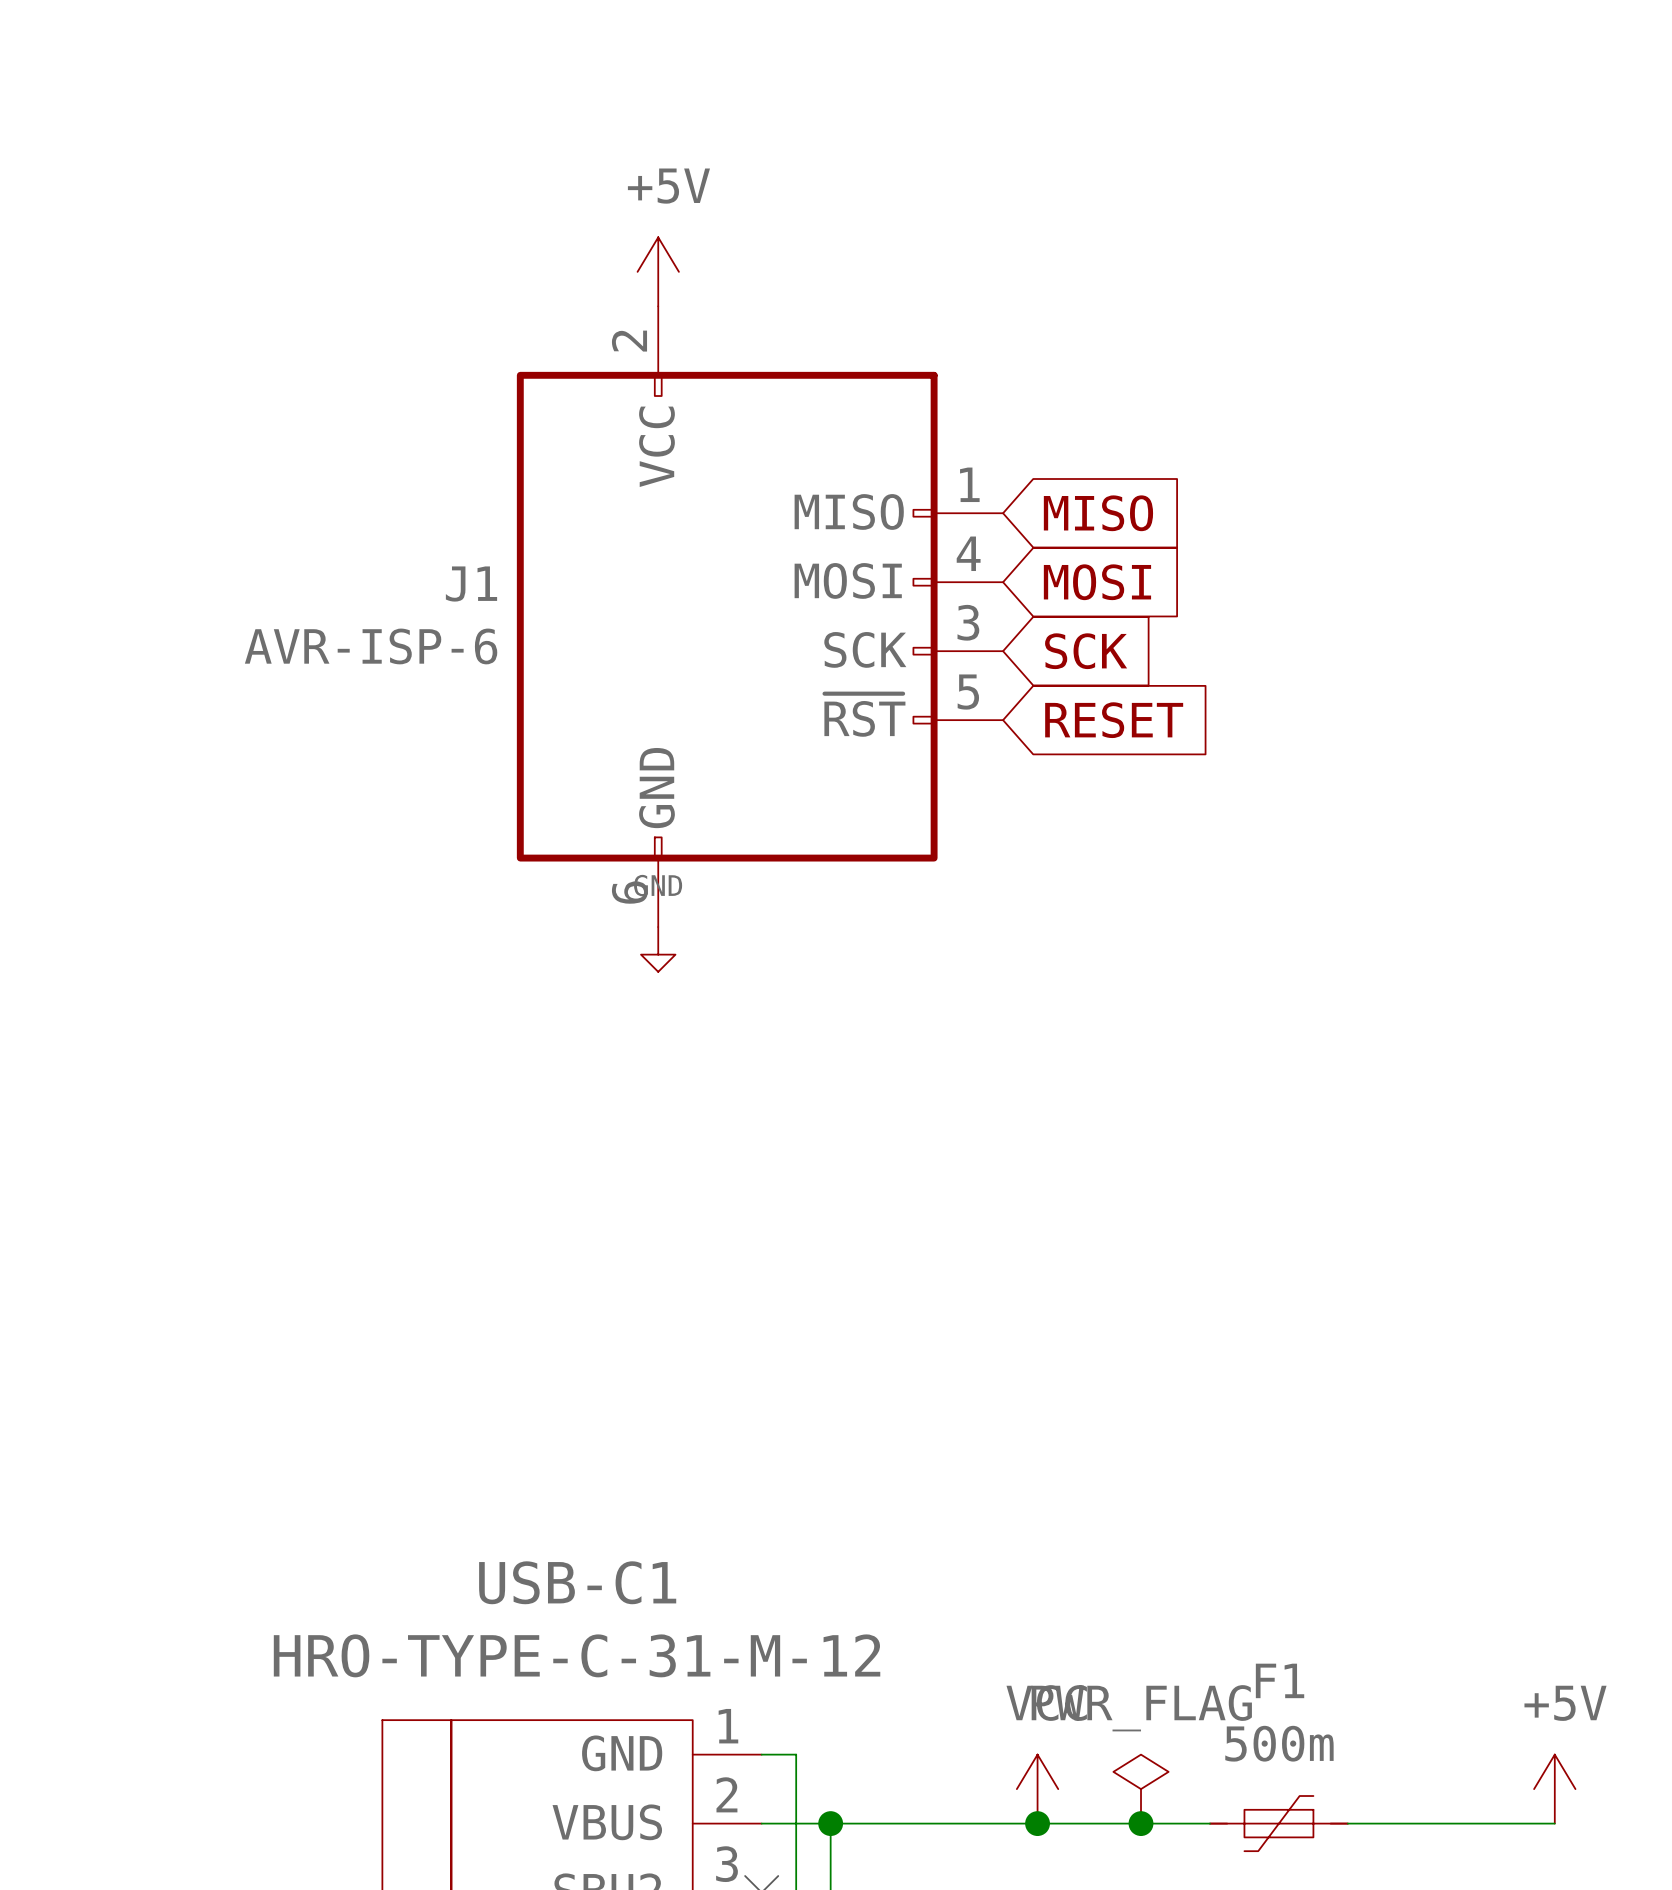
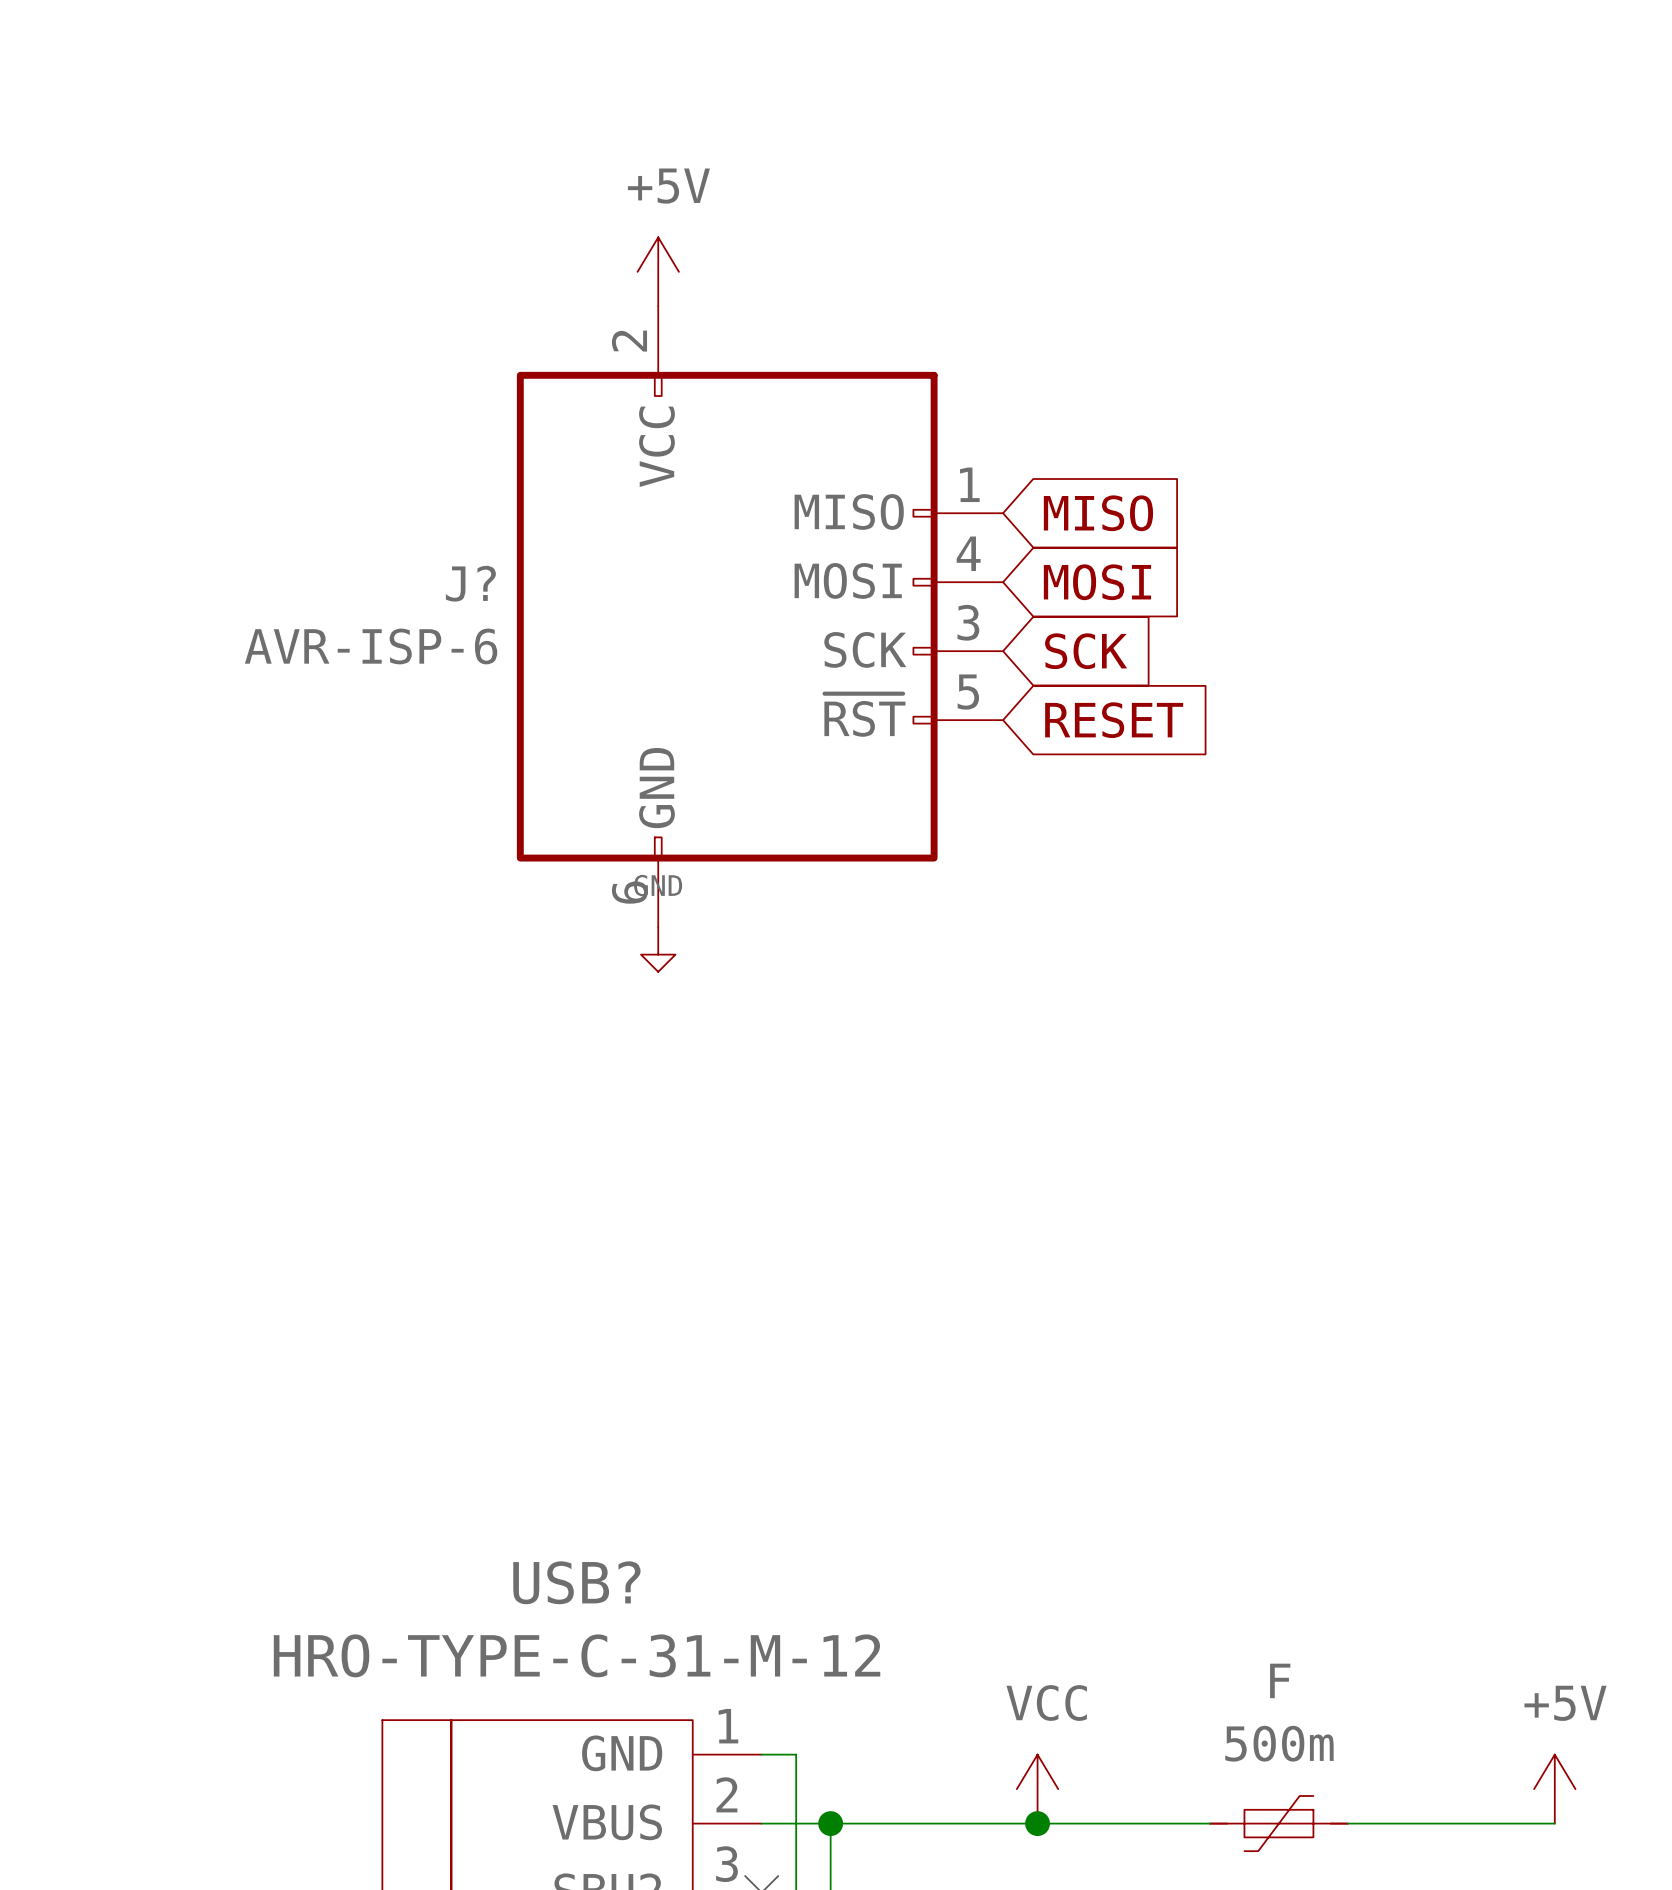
J1 name: J1 (471, 584) -> J? (470, 583)
USB-C1 name: USB-C1 (577, 1582) -> USB? (576, 1582)
F1 name: F1 (1280, 1680) -> F (1280, 1680)
power symbol: PWR_FLAG (1141, 1789) -> none
junction: (1141, 1823) -> none

